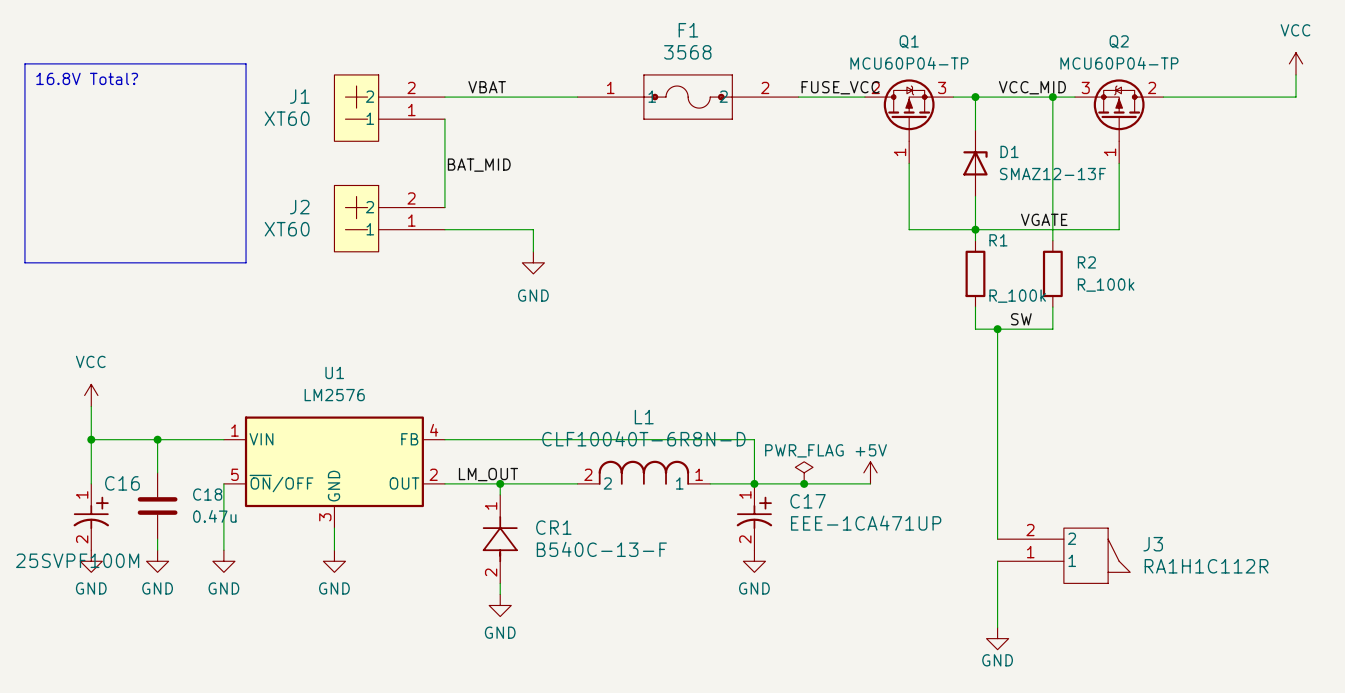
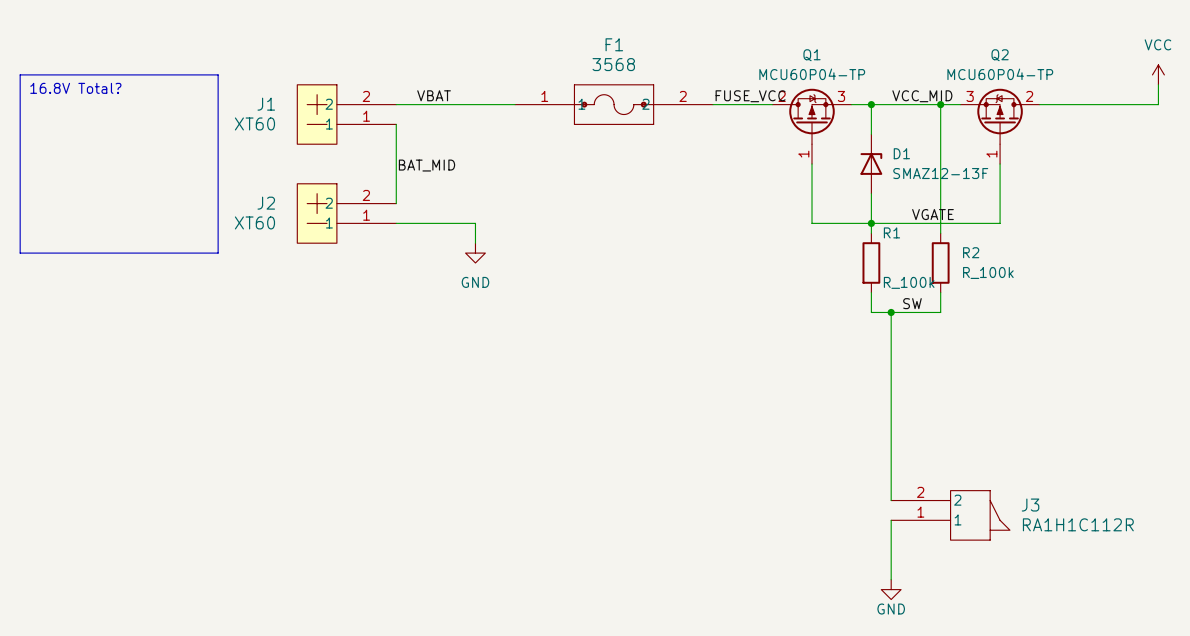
power symbol: VCC (91, 395) -> none
wire: (91, 406) (91, 483) -> none
wire: (91, 439) (223, 439) -> none
junction: (91, 439) -> none
wire: (157, 439) (157, 472) -> none
junction: (157, 439) -> none
wire: (444, 439) (754, 439) (754, 483) -> none
U1: LM2576 (334, 472) -> none
L1: CLF10040T-6R8N-D (643, 472) -> none
power symbol: PWR_FLAG (804, 472) -> none
power symbol: +5V (870, 472) -> none
label: LM_OUT (488, 474) -> none
wire: (223, 483) (223, 550) -> none
wire: (444, 483) (577, 483) -> none
wire: (500, 483) (500, 494) -> none
junction: (500, 483) -> none
wire: (710, 483) (870, 483) -> none
junction: (754, 483) -> none
junction: (804, 483) -> none
C18: 0.47u (157, 506) -> none
C16: 25SVPF100M (91, 517) -> none
C17: EEE-1CA471UP (754, 517) -> none
wire: (334, 528) (334, 550) -> none
wire: (157, 539) (157, 550) -> none
CR1: B540C-13-F (500, 539) -> none
power symbol: GND (91, 561) -> none
power symbol: GND (157, 561) -> none
power symbol: GND (223, 561) -> none
power symbol: GND (334, 561) -> none
power symbol: GND (754, 561) -> none
wire: (500, 583) (500, 594) -> none
power symbol: GND (500, 605) -> none

